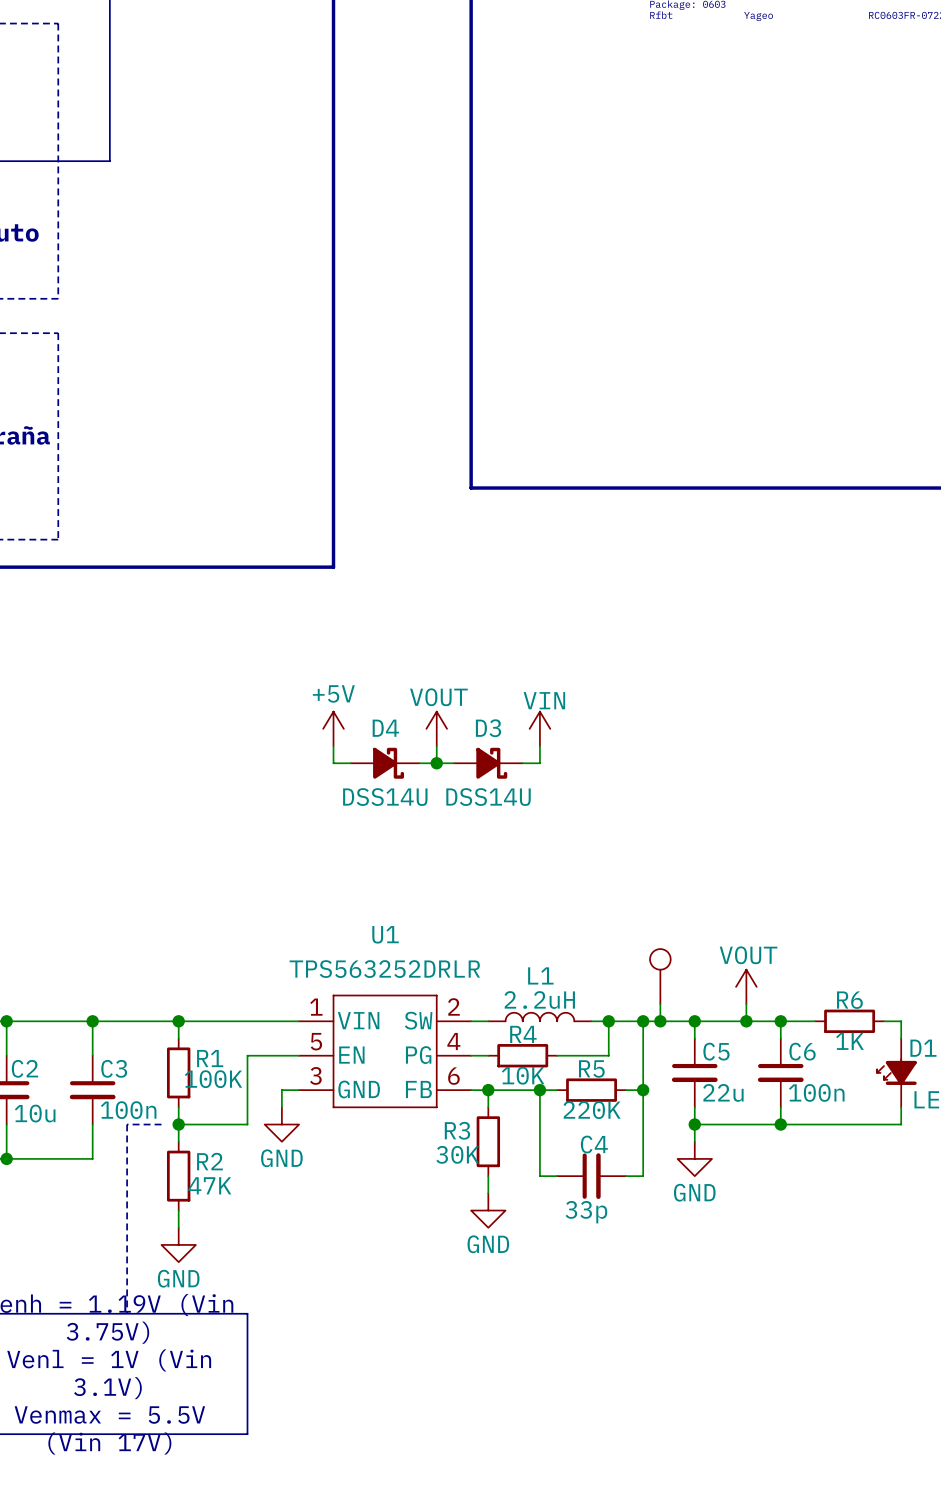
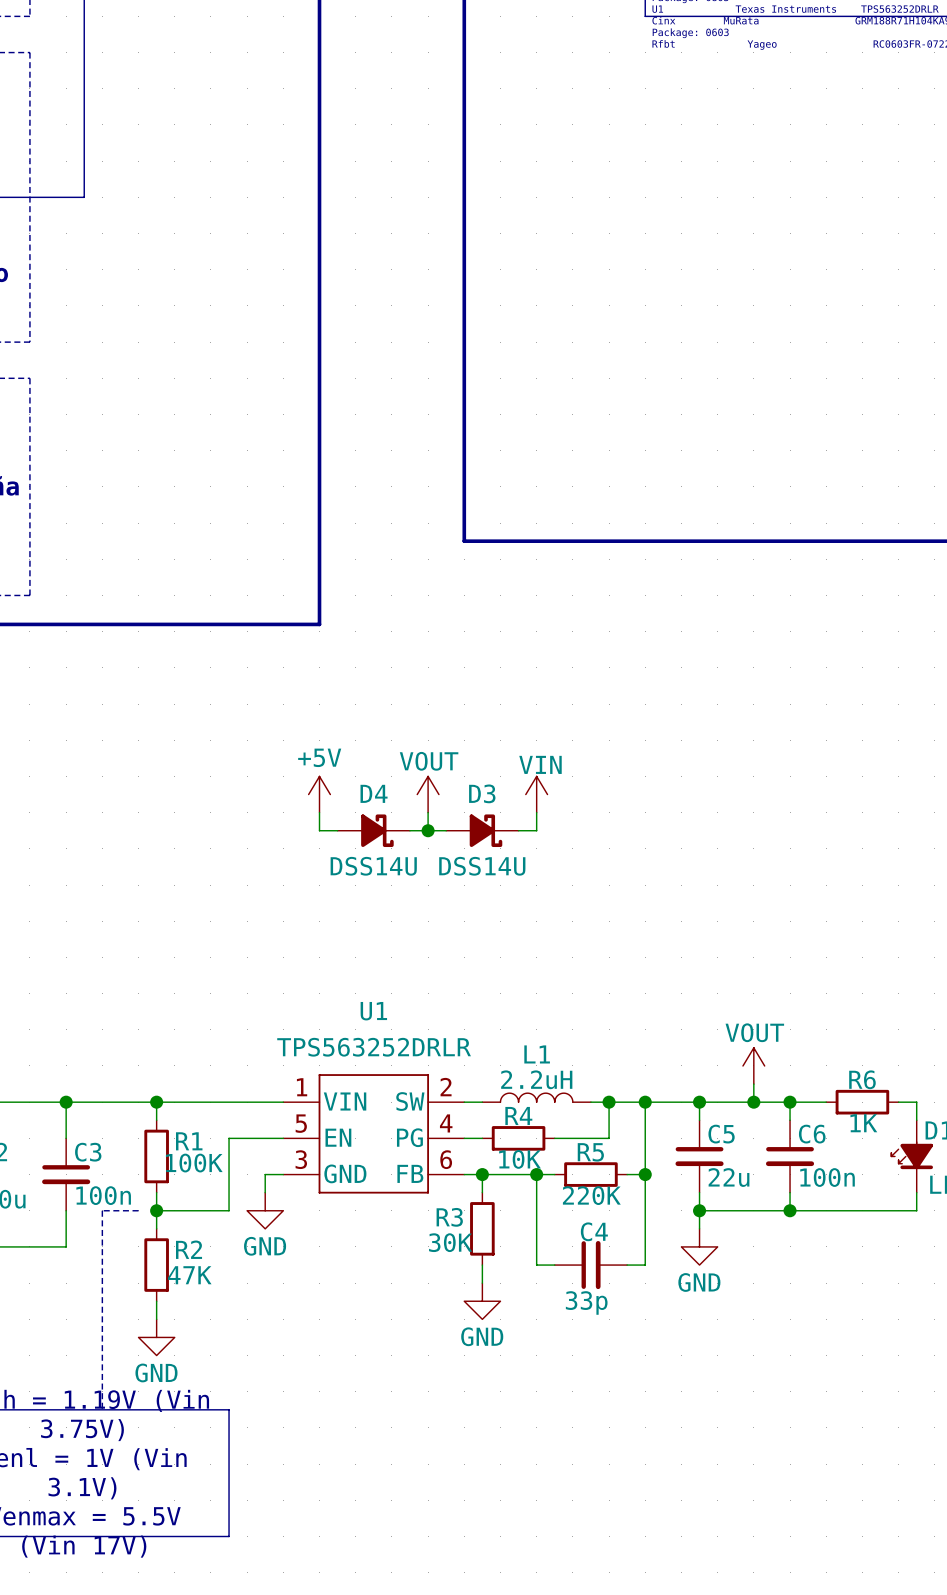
part: (660, 976) -> none
wire: (660, 1004) (660, 1021) -> none
junction: (660, 1021) -> none

